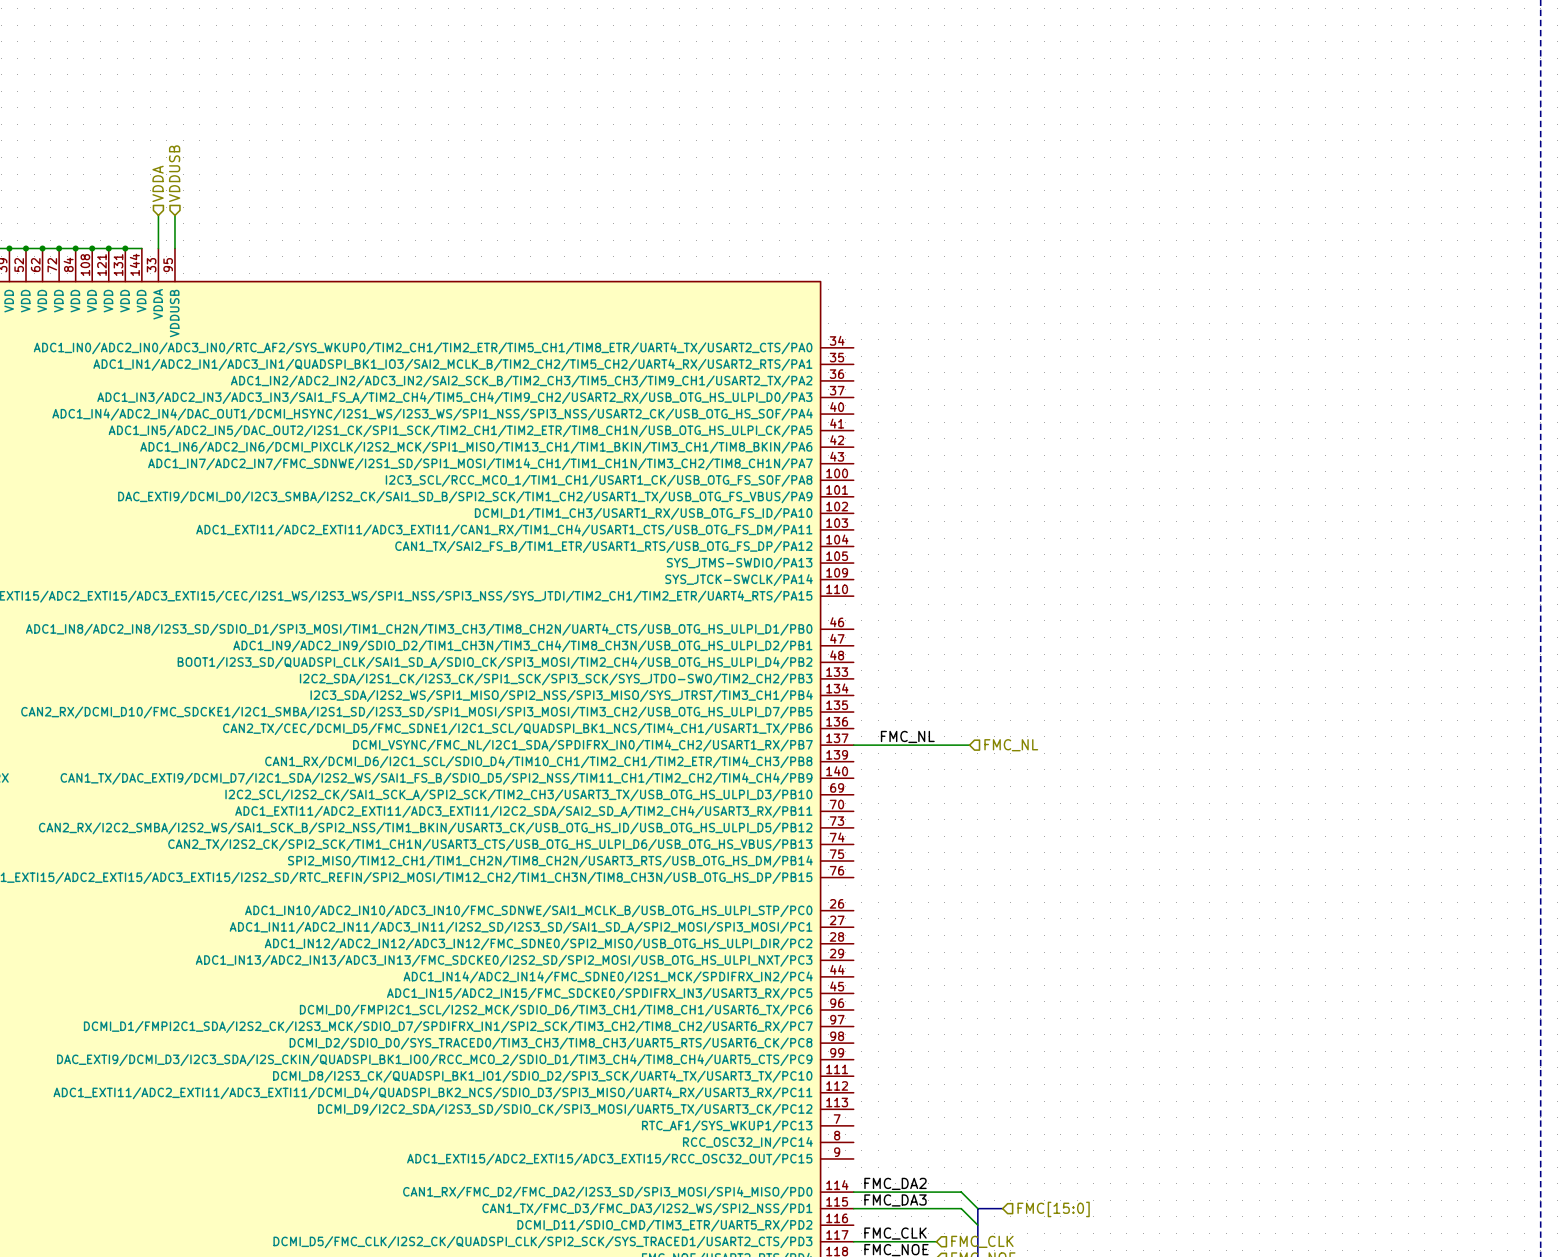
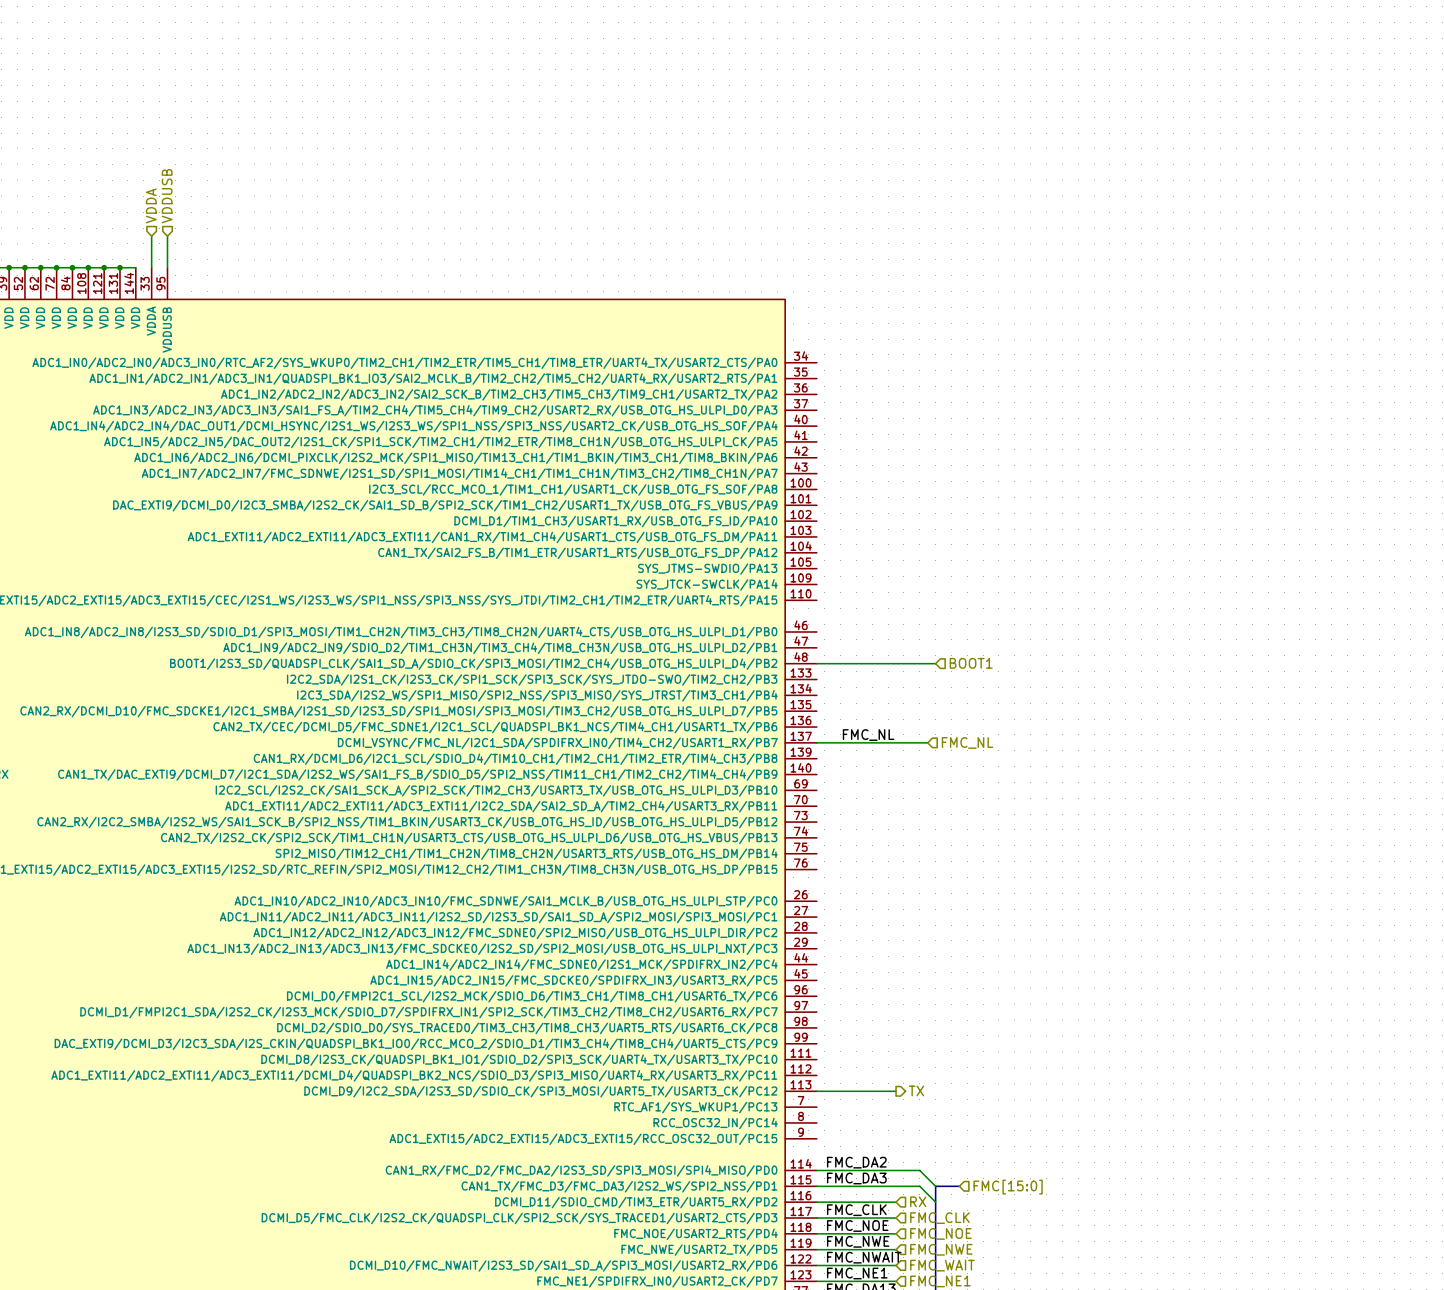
hierarchical label: none -> BOOT1 (971, 663)
wire: none -> (816, 663) (935, 663)
hierarchical label: none -> TX (916, 1090)
wire: none -> (816, 1091) (896, 1091)
hierarchical label: none -> RX (918, 1201)
wire: none -> (816, 1202) (896, 1202)

